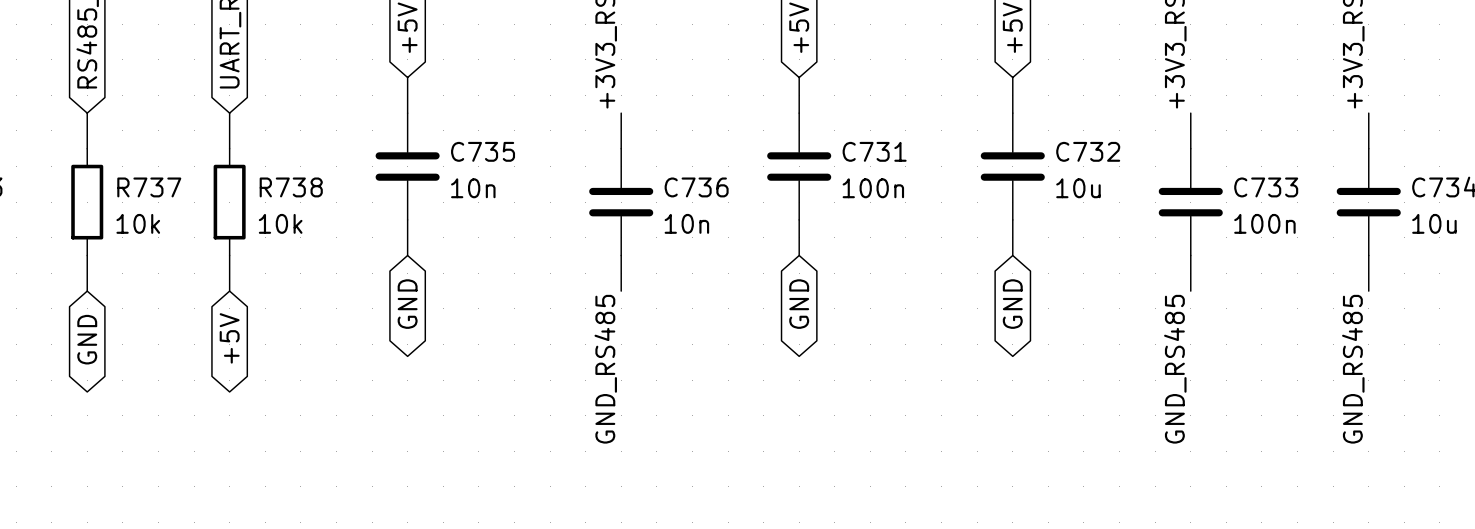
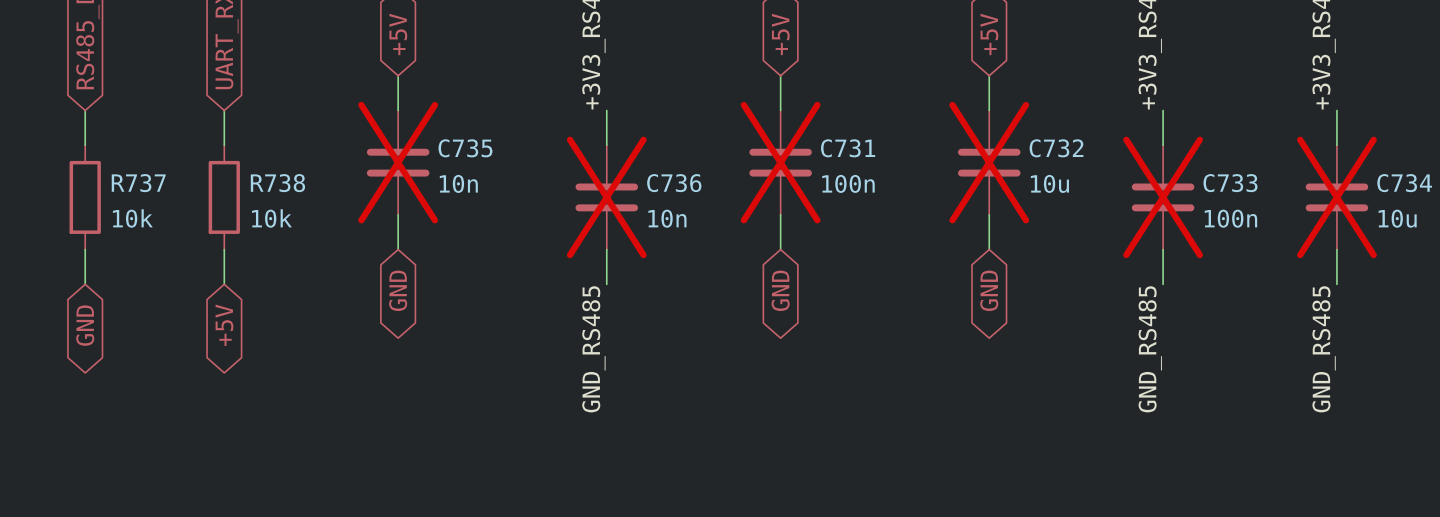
C735 do-not-place cross: none -> (398, 162)
C731 do-not-place cross: none -> (780, 162)
C732 do-not-place cross: none -> (989, 162)
C736 do-not-place cross: none -> (606, 197)
C733 do-not-place cross: none -> (1163, 197)
C734 do-not-place cross: none -> (1336, 197)

